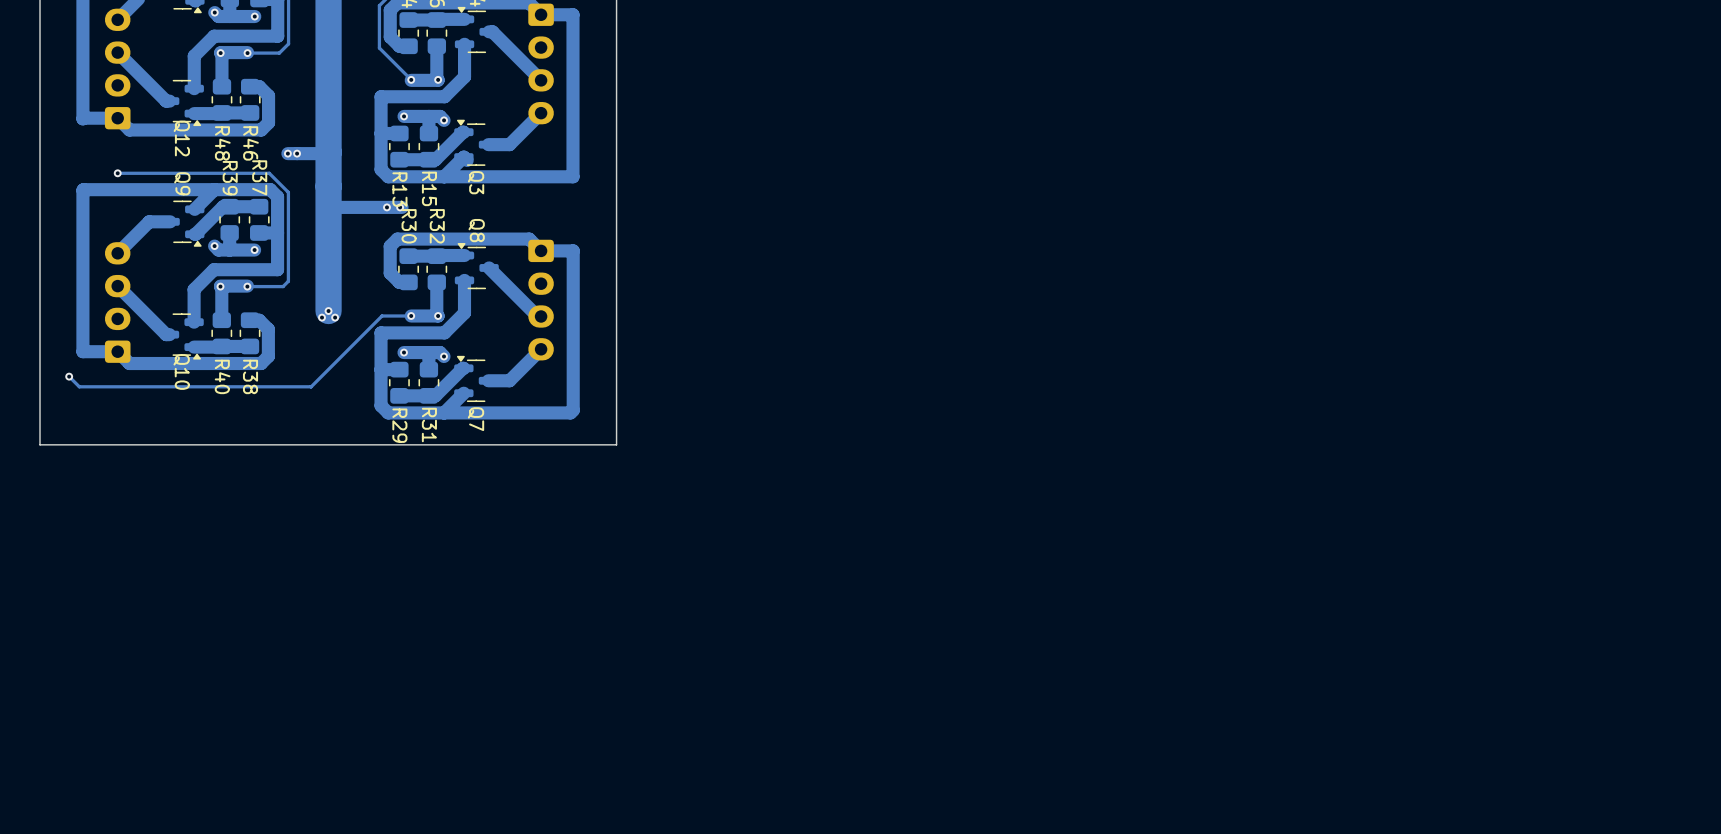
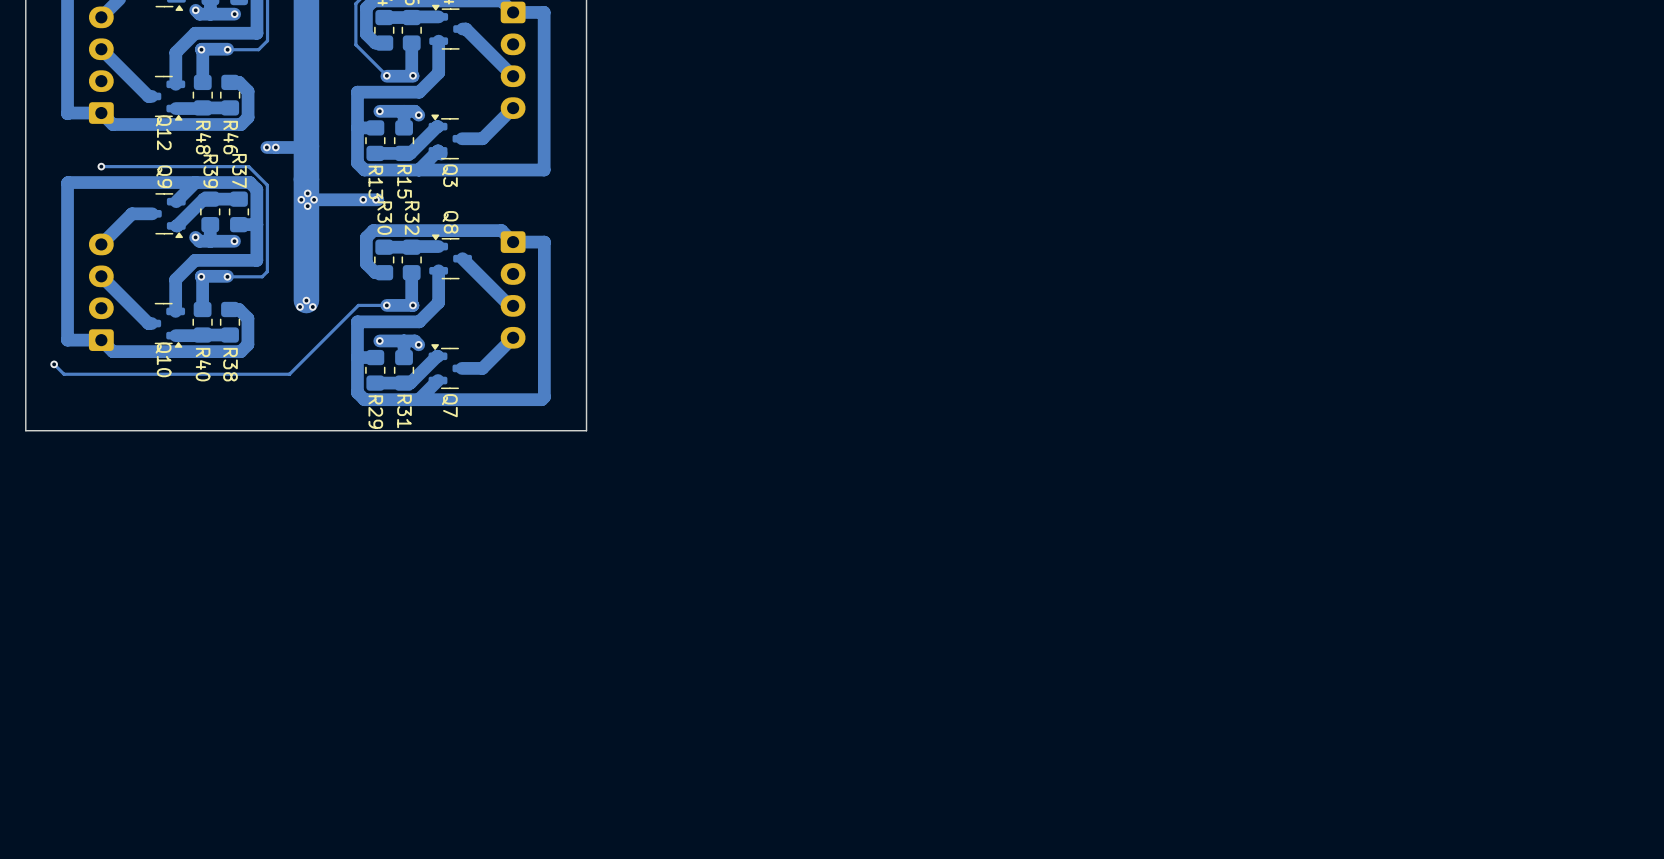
via: none -> (307, 193)
via: none -> (301, 199)
via: none -> (314, 199)
via: none -> (307, 206)

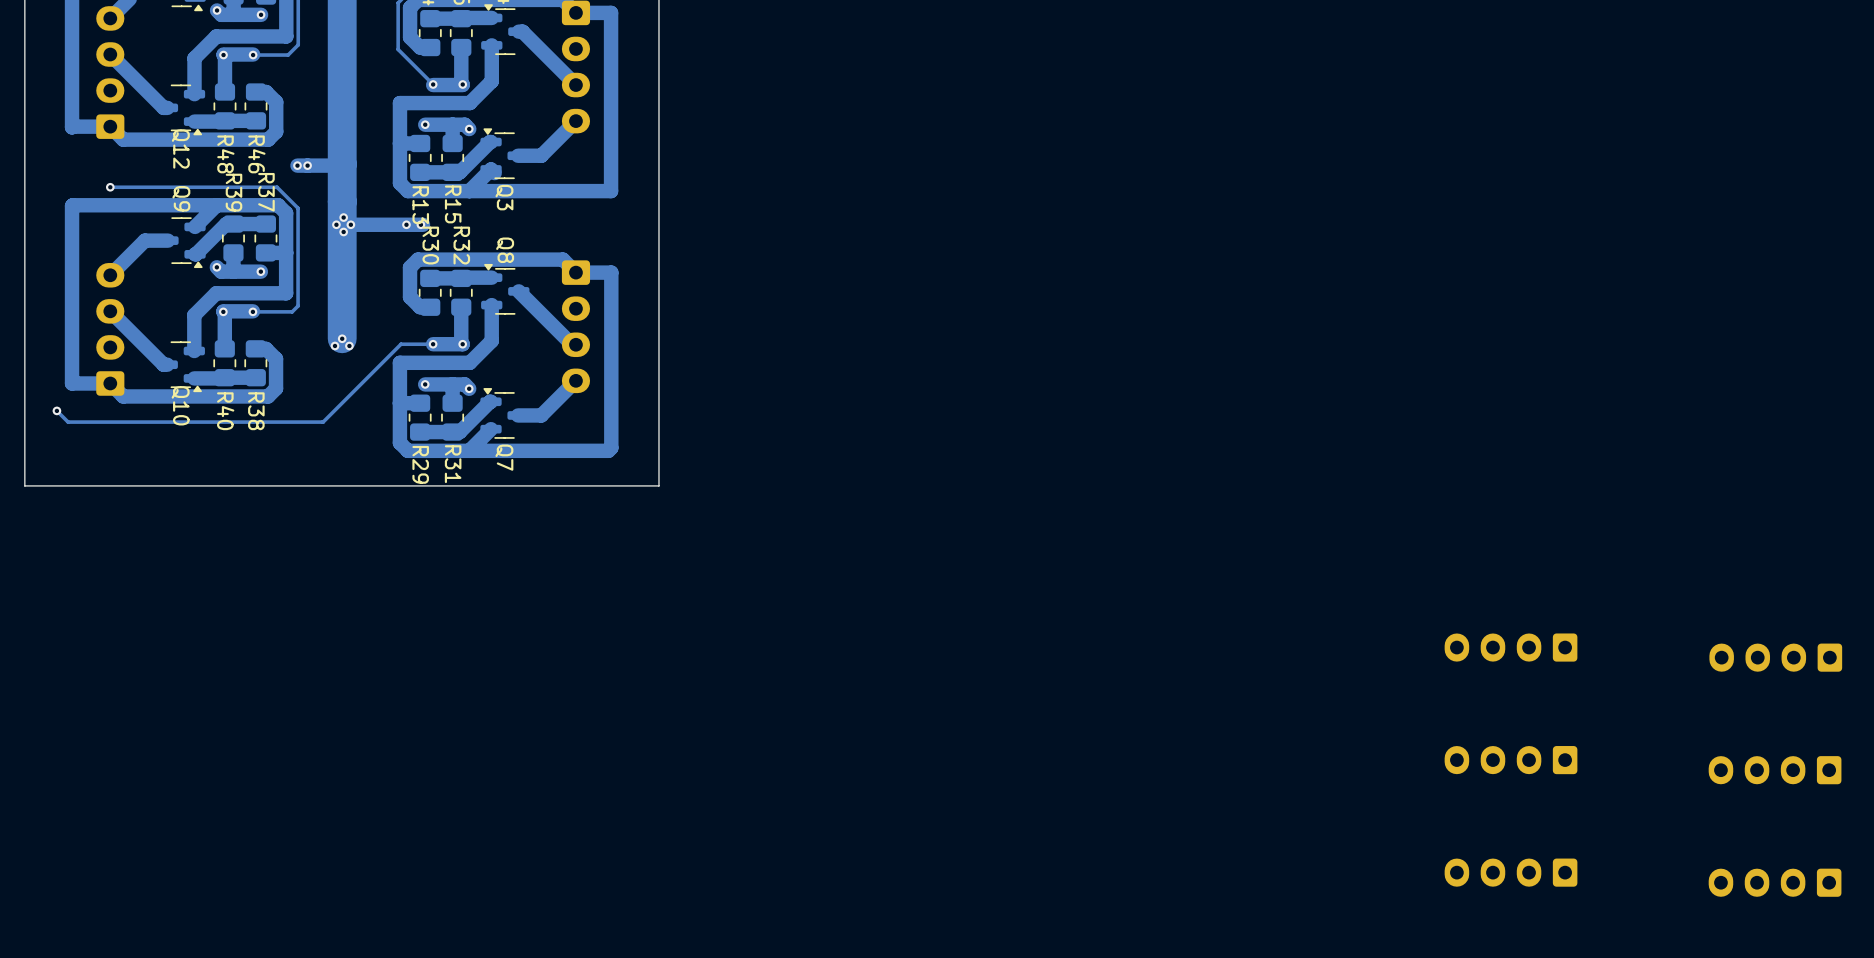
part: none -> (1511, 647)
part: none -> (1775, 657)
part: none -> (1511, 760)
part: none -> (1775, 770)
part: none -> (1511, 872)
part: none -> (1775, 882)

